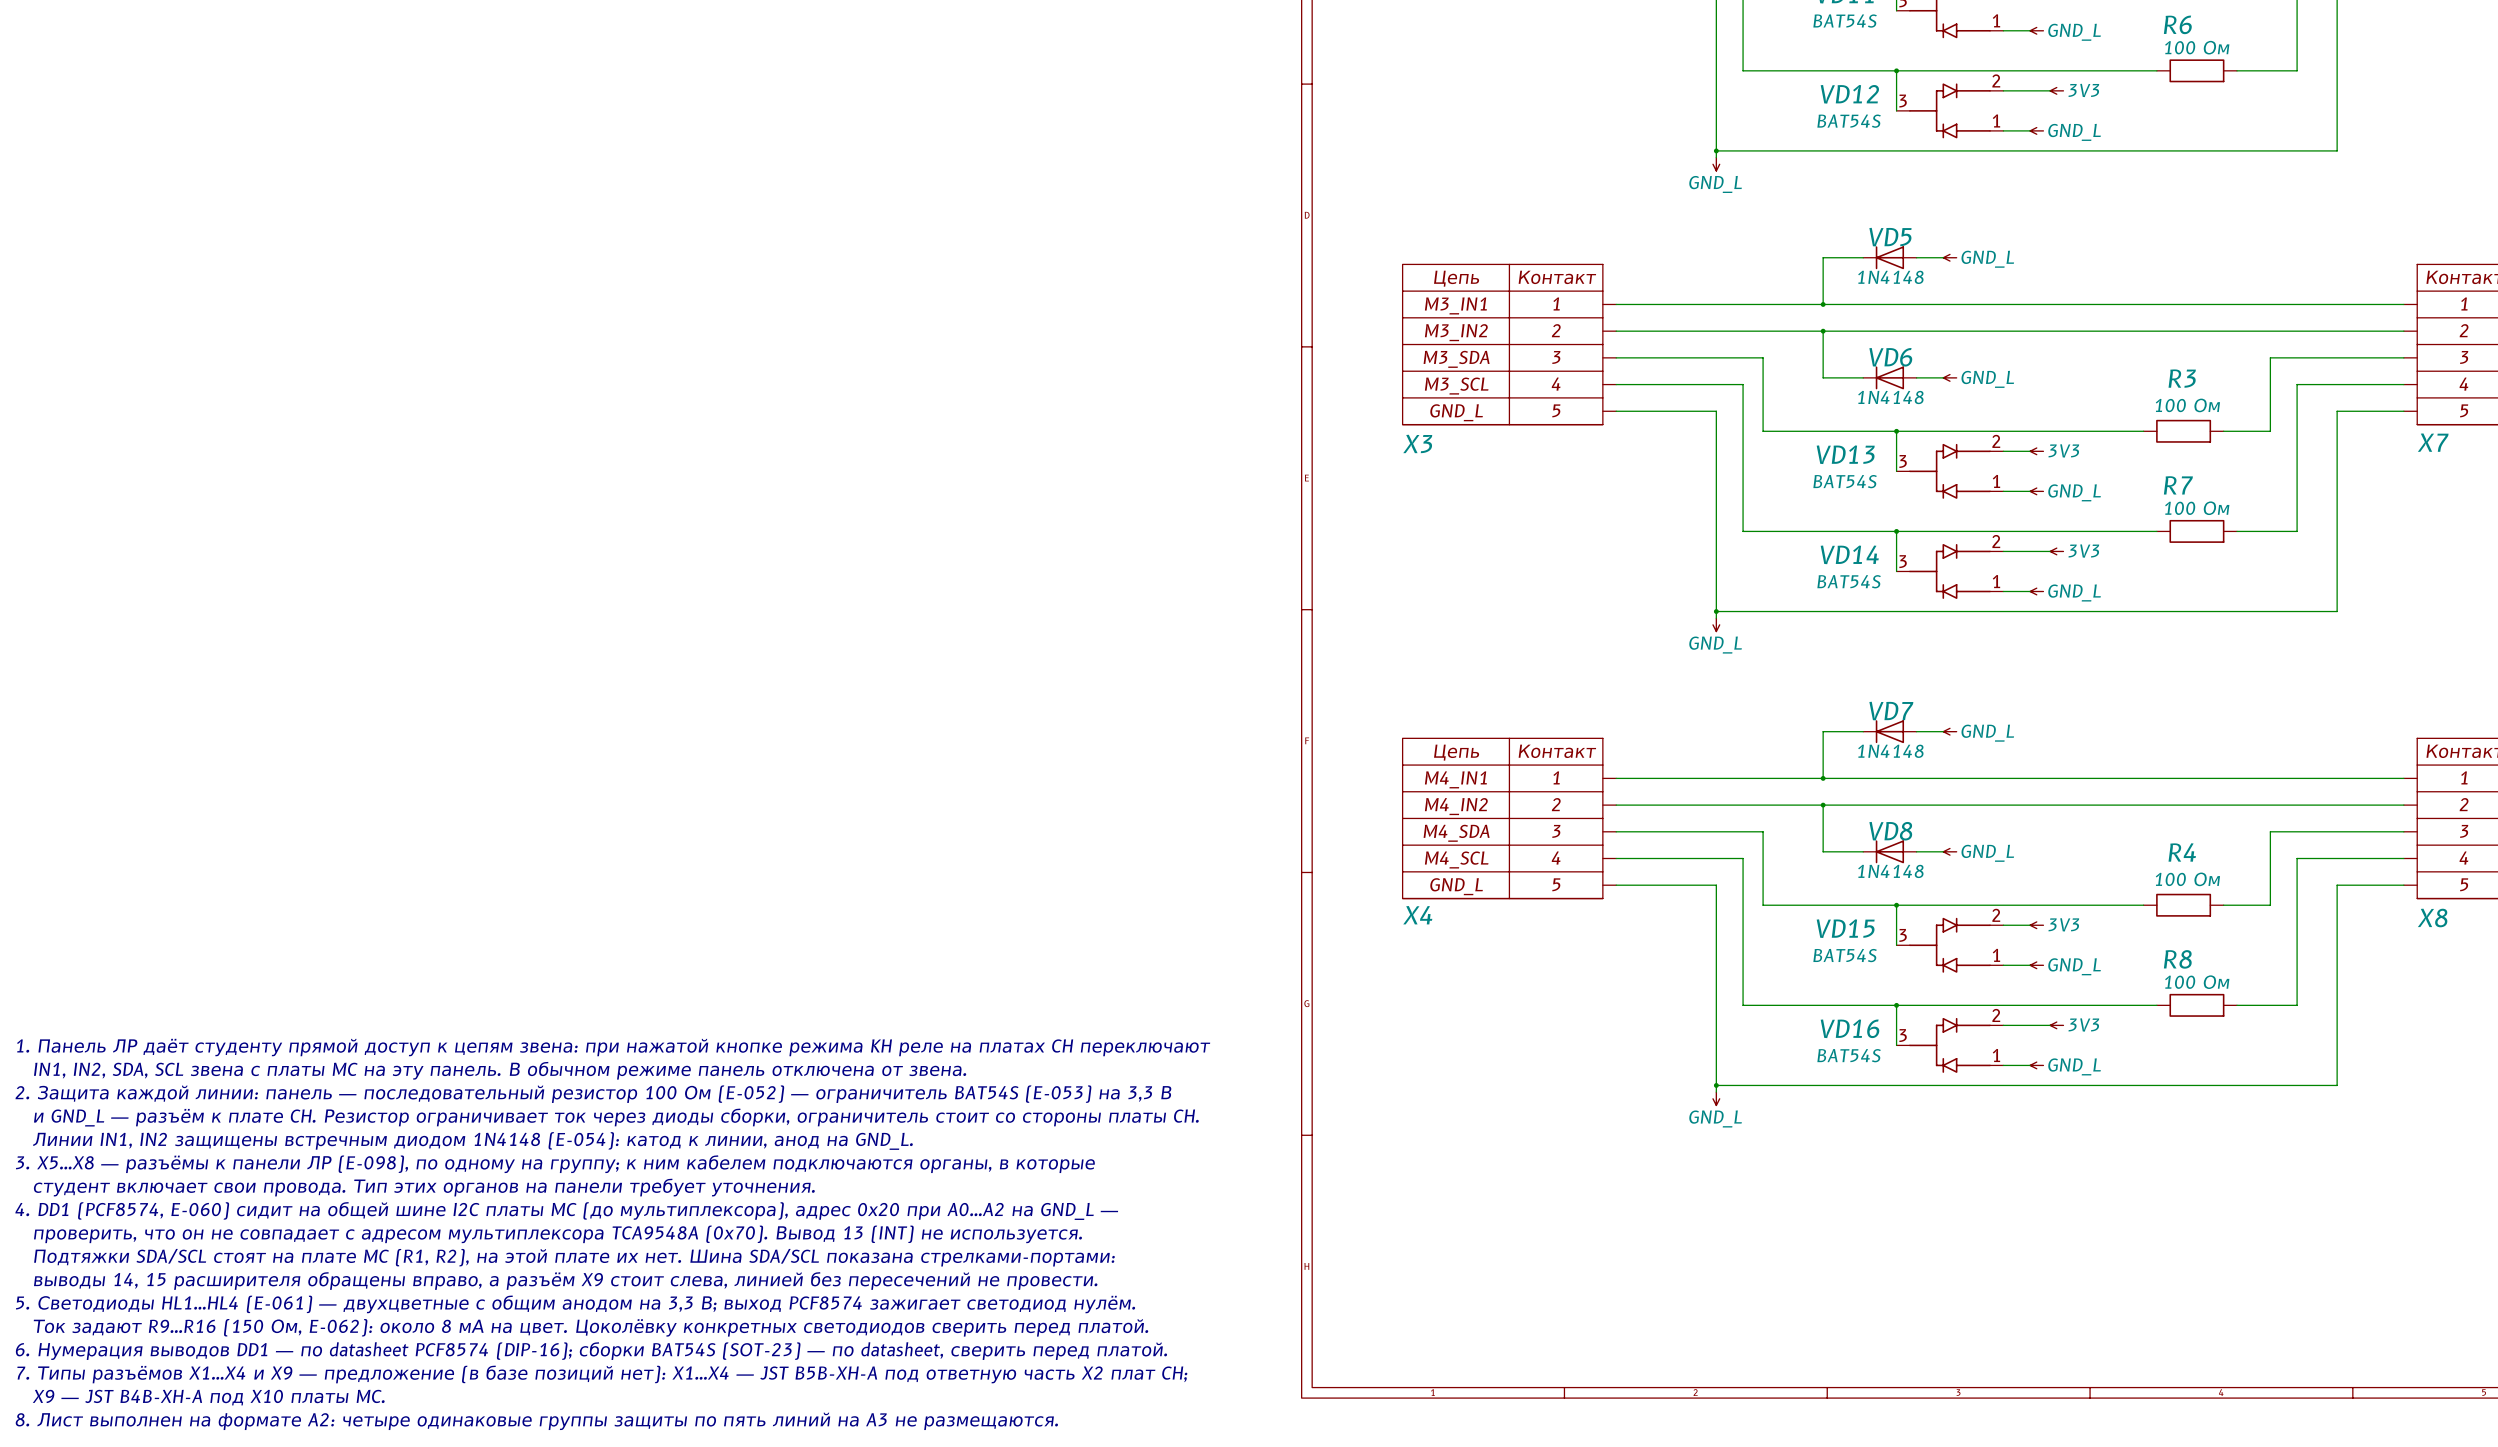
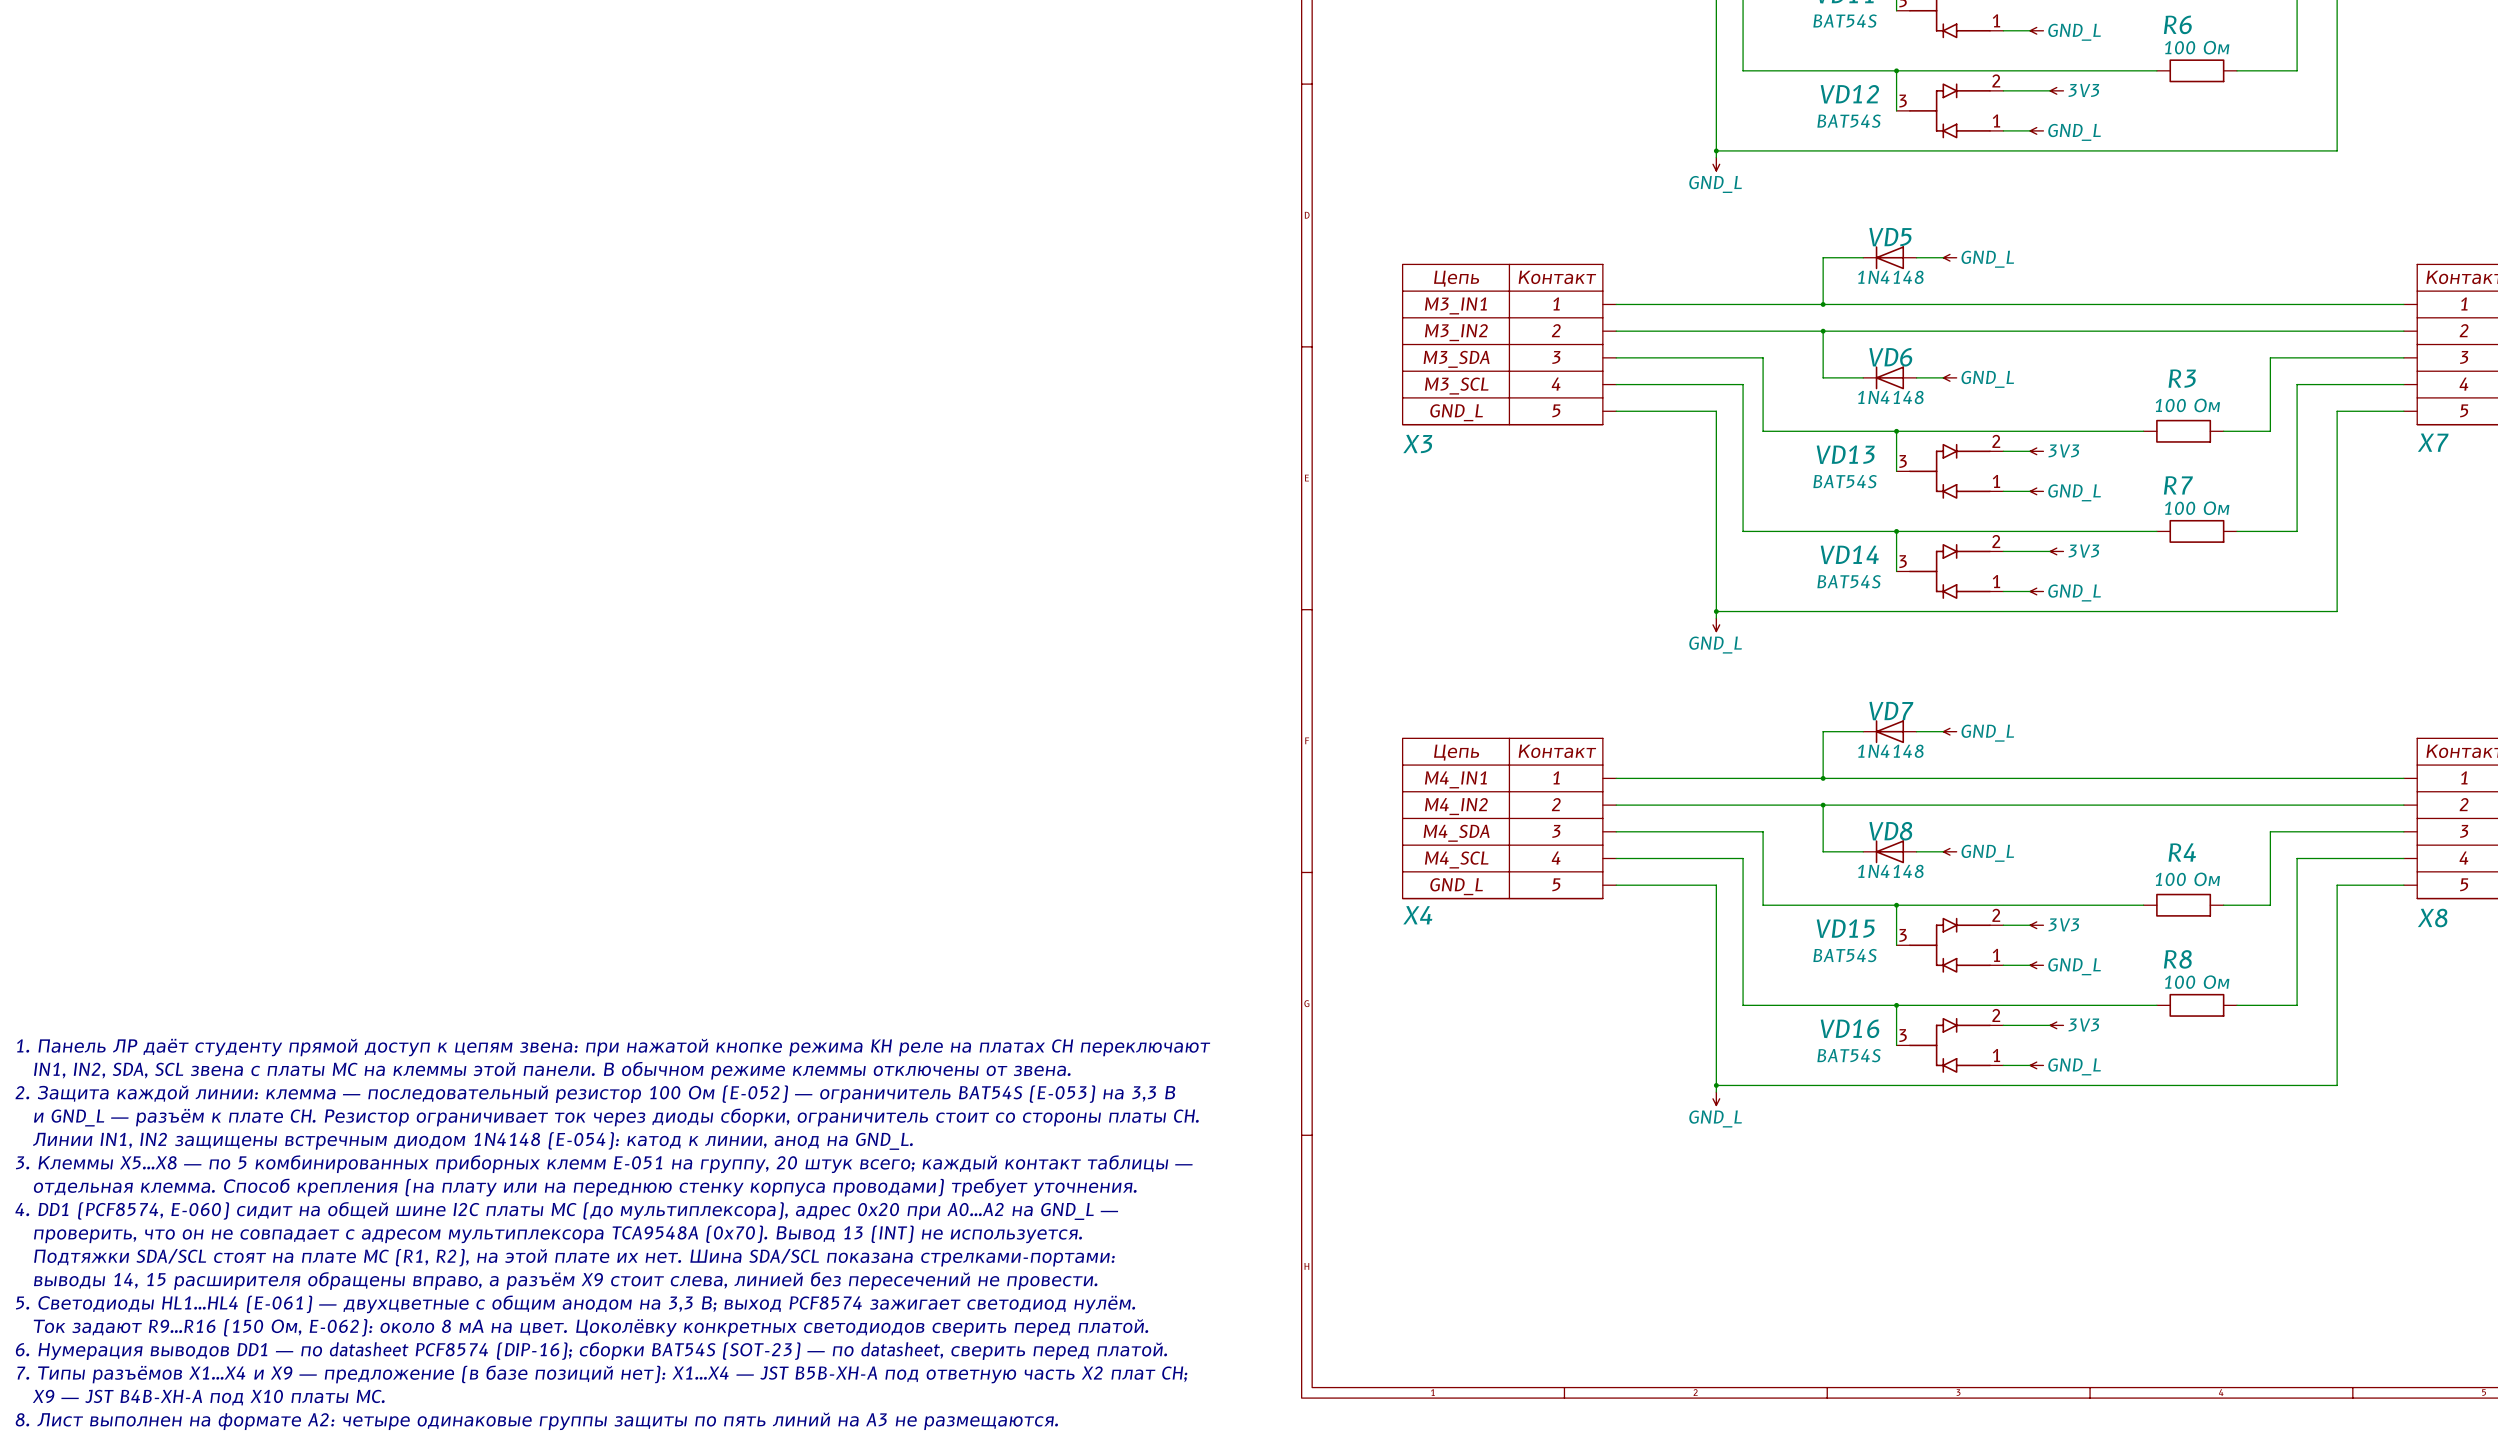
text: IN1, IN2, SDA, SCL звена с платы MC на эту панель. В обычном режиме панель отключена от звена. (500, 1070) -> IN1, IN2, SDA, SCL звена с платы MC на клеммы этой панели. В обычном режиме клеммы отключены от звена. (552, 1070)
text: 2. Защита каждой линии: панель — последовательный резистор 100 Ом (E-052) — ограничитель BAT54S (E-053) на 3,3 В (593, 1094) -> 2. Защита каждой линии: клемма — последовательный резистор 100 Ом (E-052) — ограничитель BAT54S (E-053) на 3,3 В (595, 1094)
text: 3. X5…X8 — разъёмы к панели ЛР (E-098), по одному на группу; к ним кабелем подключаются органы, в которые (555, 1164) -> 3. Клеммы X5…X8 — по 5 комбинированных приборных клемм E-051 на группу, 20 штук всего; каждый контакт таблицы — (604, 1164)
text: студент включает свои провода. Тип этих органов на панели требует уточнения. (424, 1187) -> отдельная клемма. Способ крепления (на плату или на переднюю стенку корпуса проводами) требует уточнения. (585, 1187)

